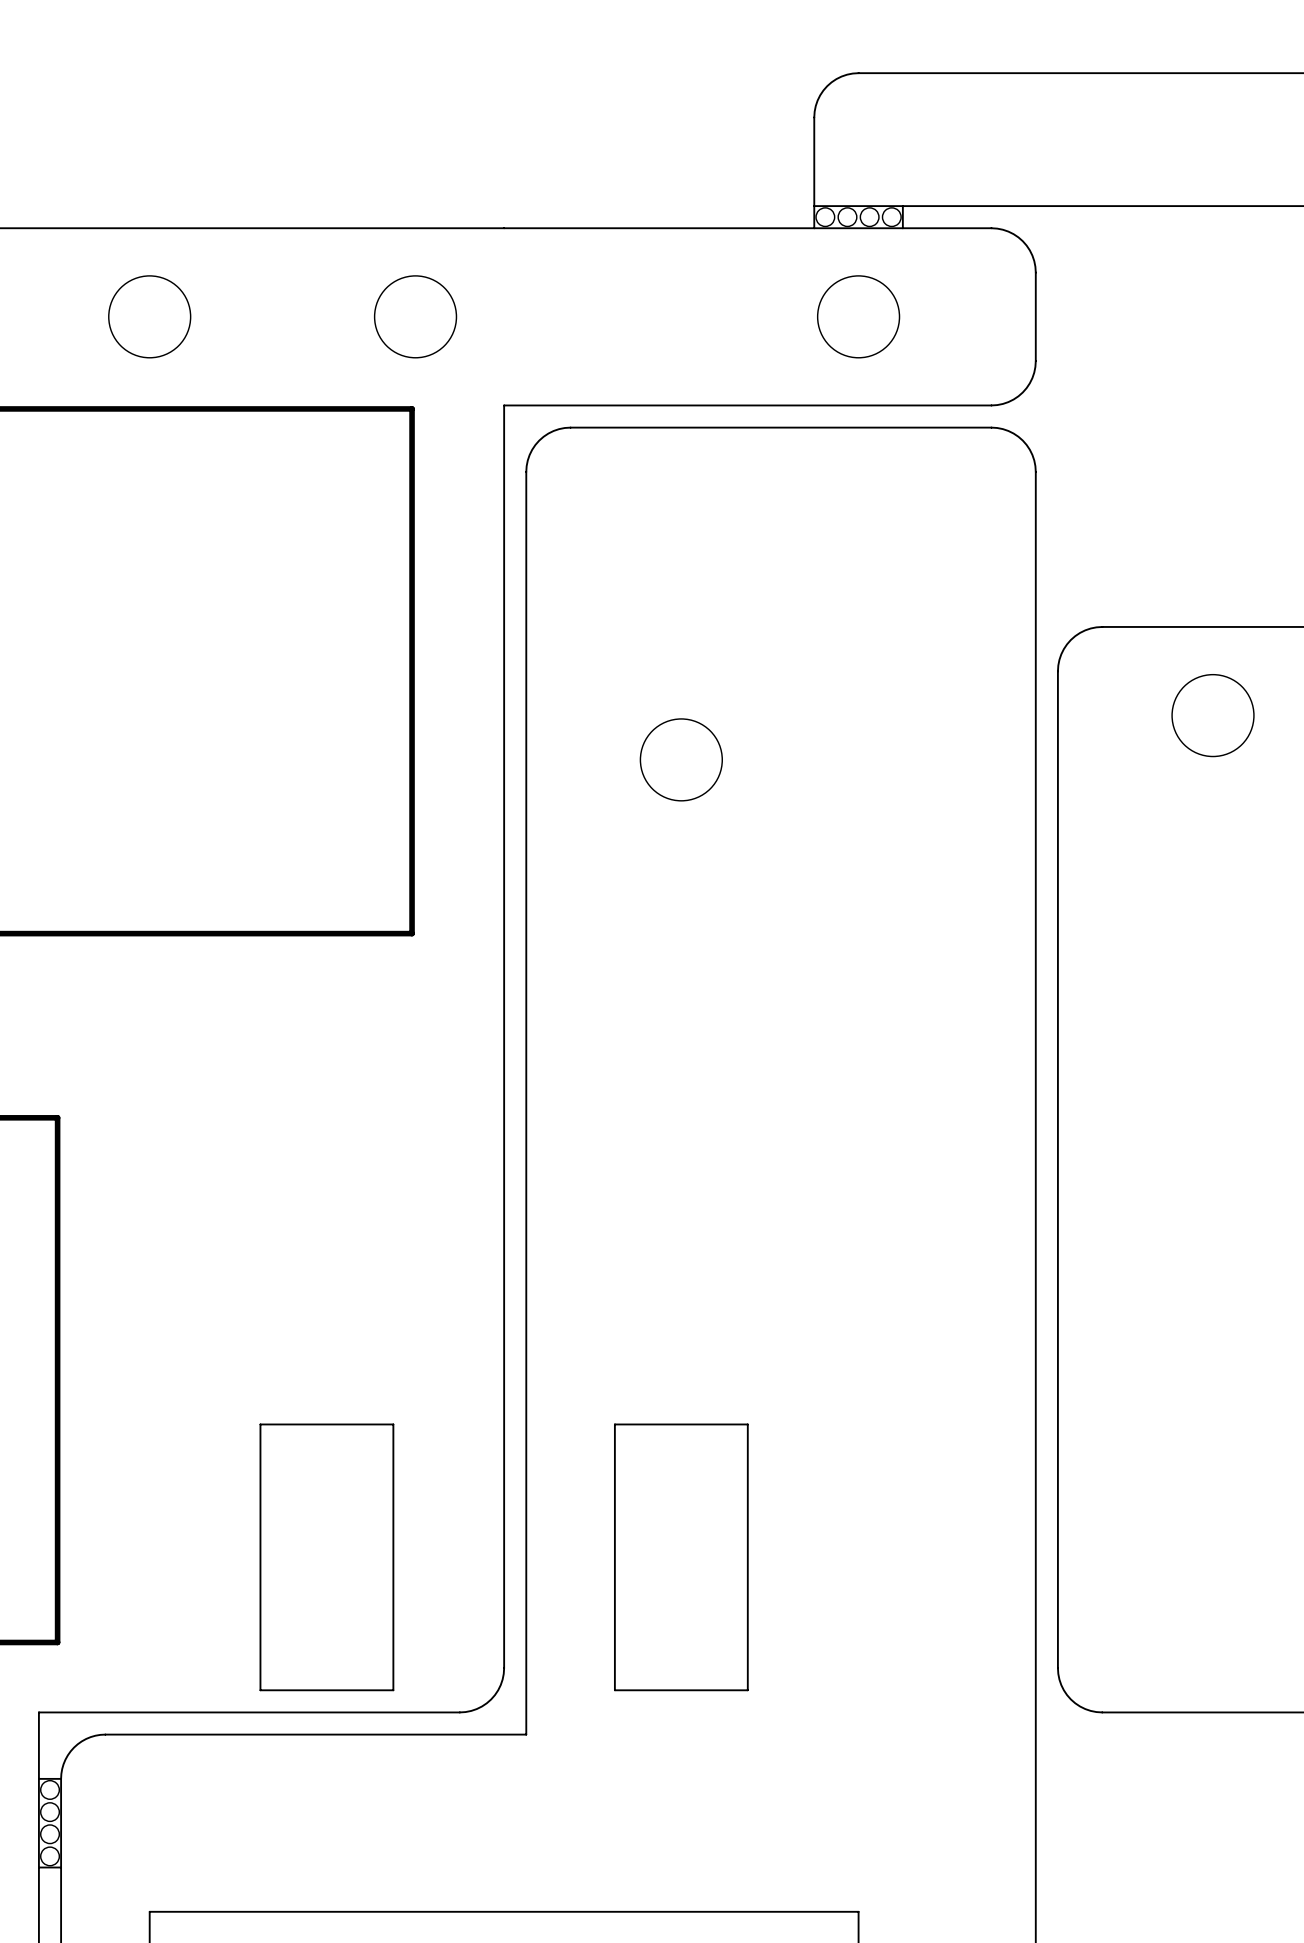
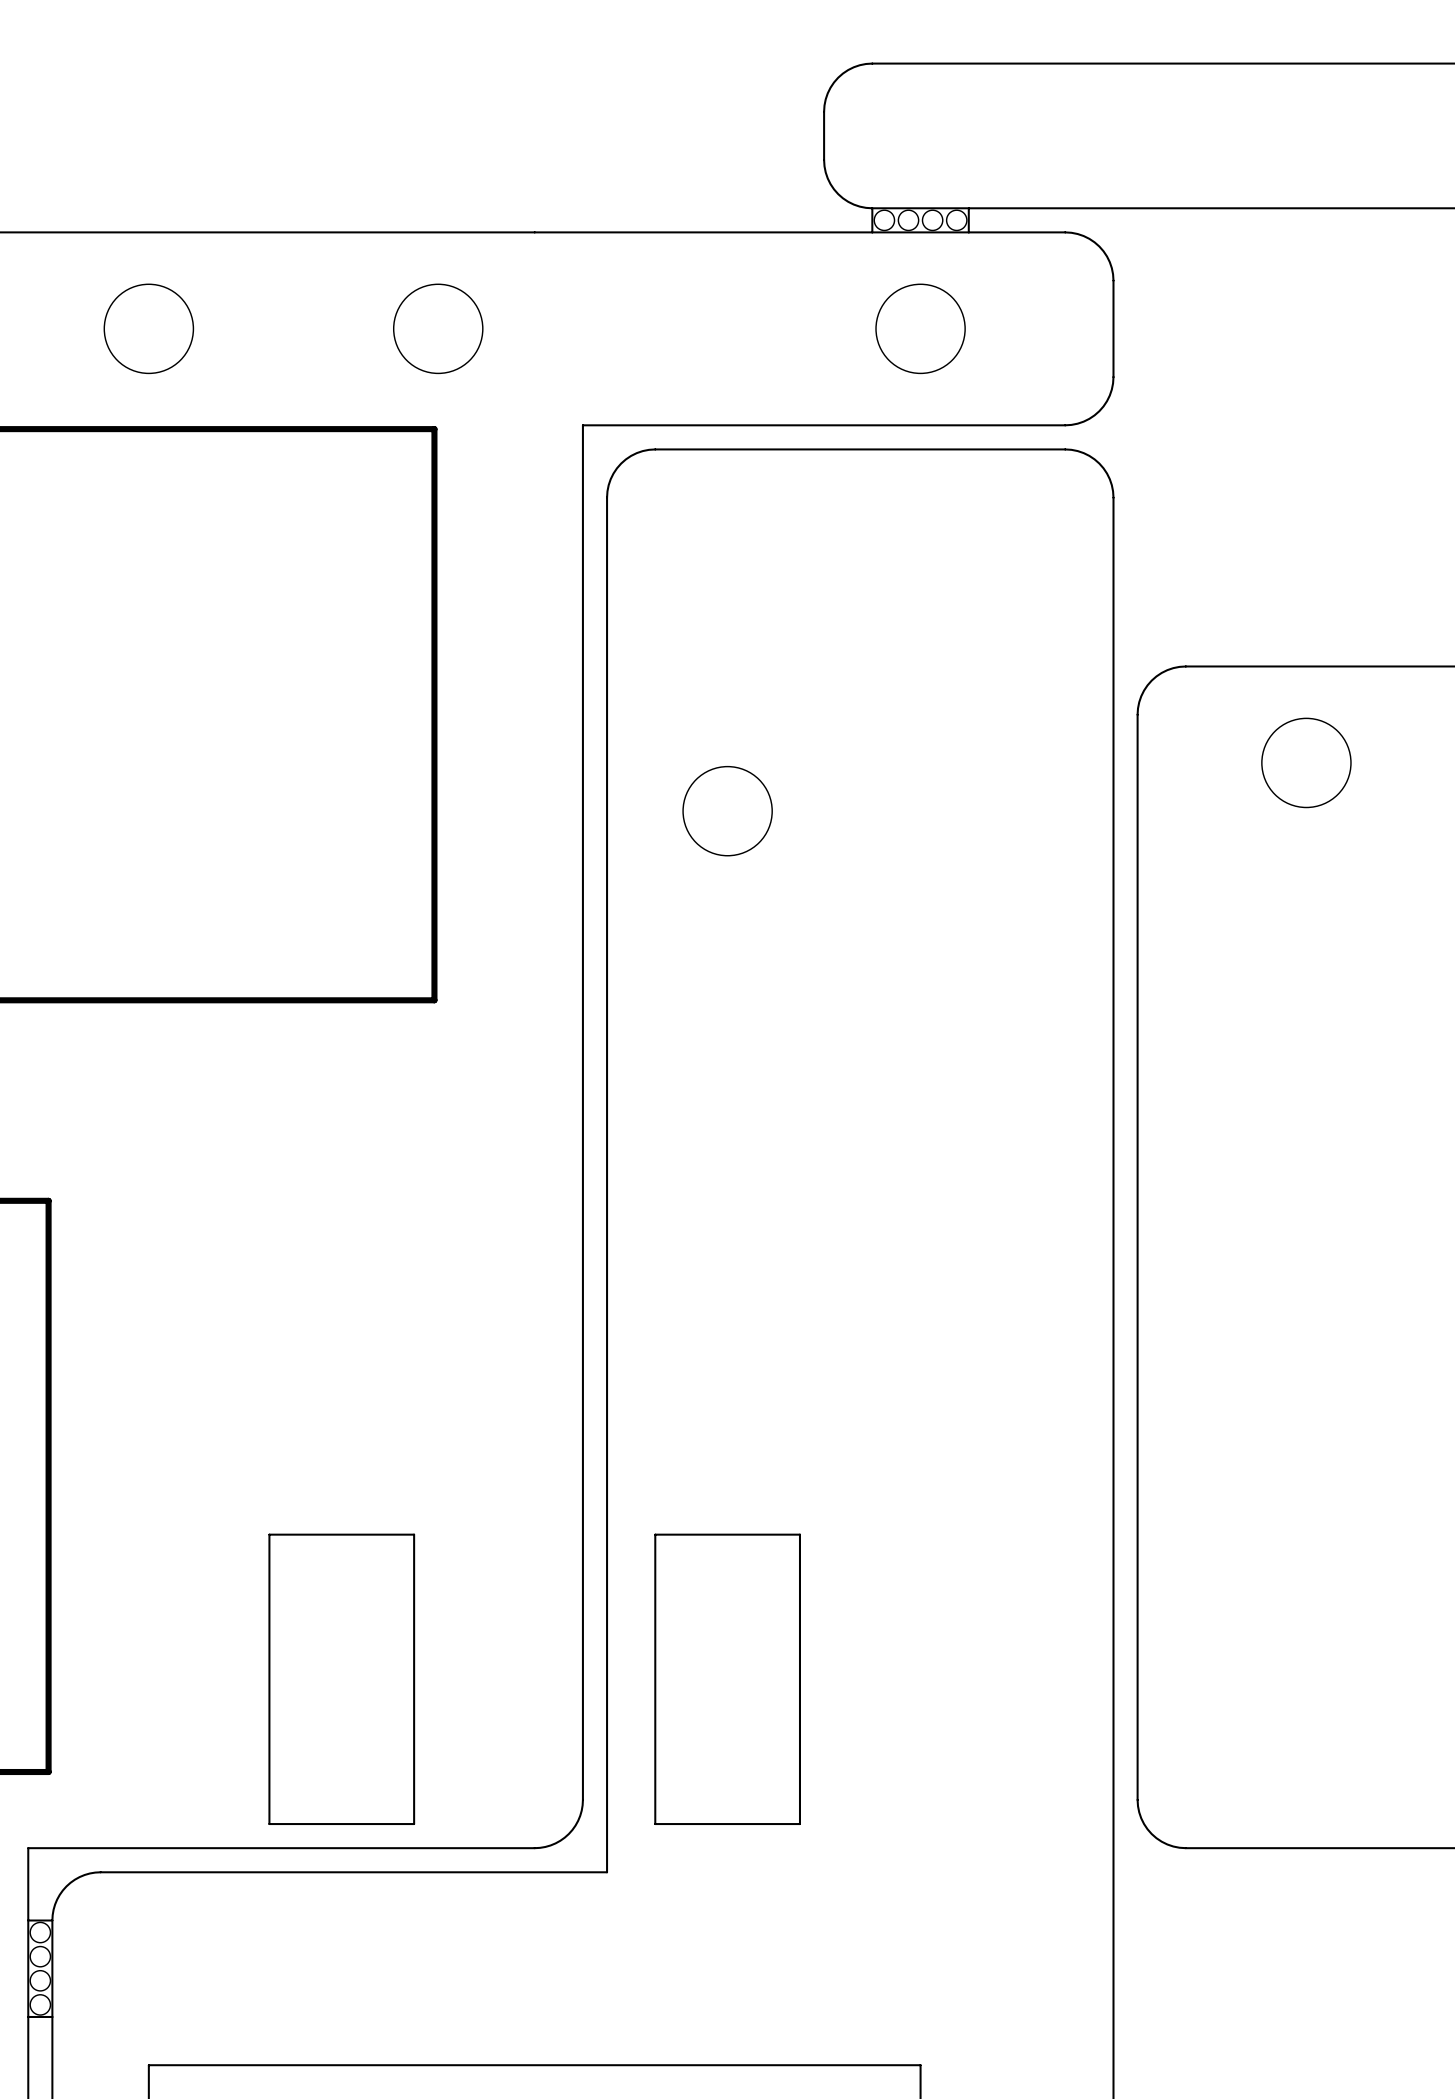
board edge: (858, 73) (841, 76) (831, 82) (820, 95) (815, 106) (814, 206) -> (920, 63) (872, 63) (853, 67) (838, 77) (830, 87) (825, 99) (824, 160) (827, 178) (834, 189) (842, 198) (853, 204) (872, 208)
board edge: (548, 405) (504, 405) (504, 1668) (500, 1685) (491, 1699) (476, 1709) (459, 1712) -> (582, 425) (582, 1805) (575, 1825) (568, 1834) (555, 1843) (540, 1847) (486, 1848)
board edge: (614, 427) (570, 427) (553, 430) (543, 436) (535, 444) (529, 454) (526, 466) (526, 1734) -> (655, 449) (636, 453) (621, 463) (610, 479) (607, 497) (607, 1872) (558, 1872)

